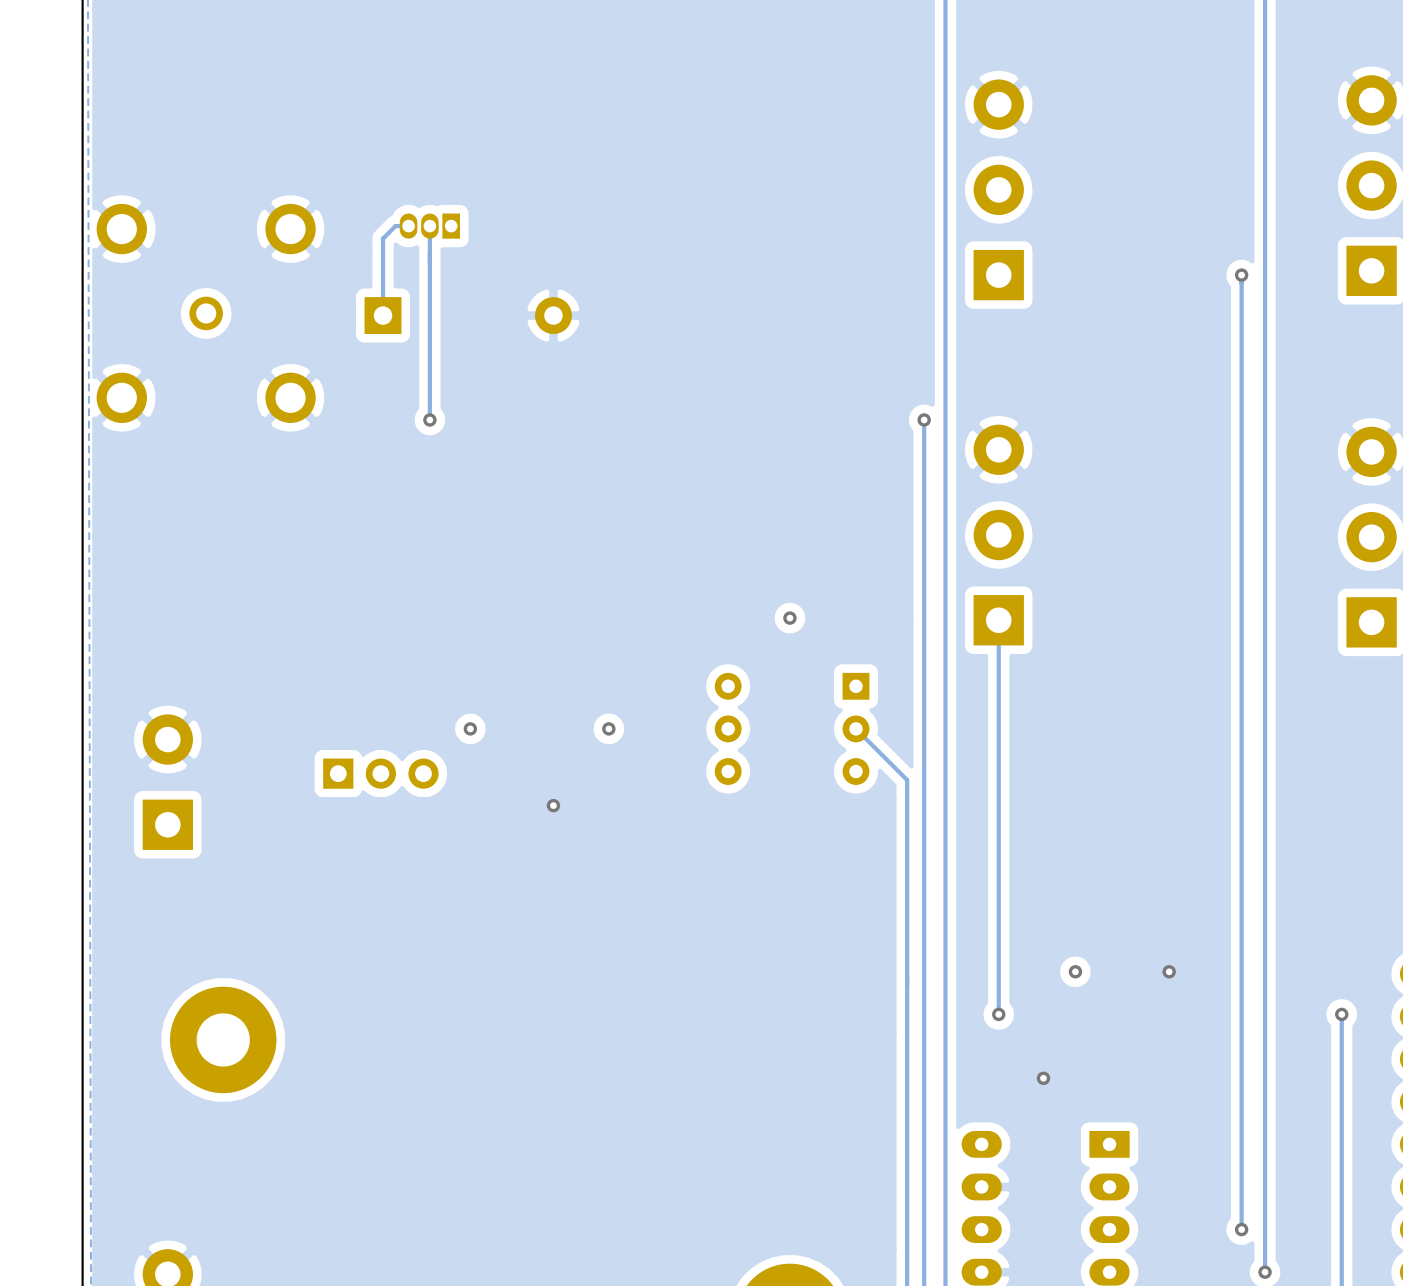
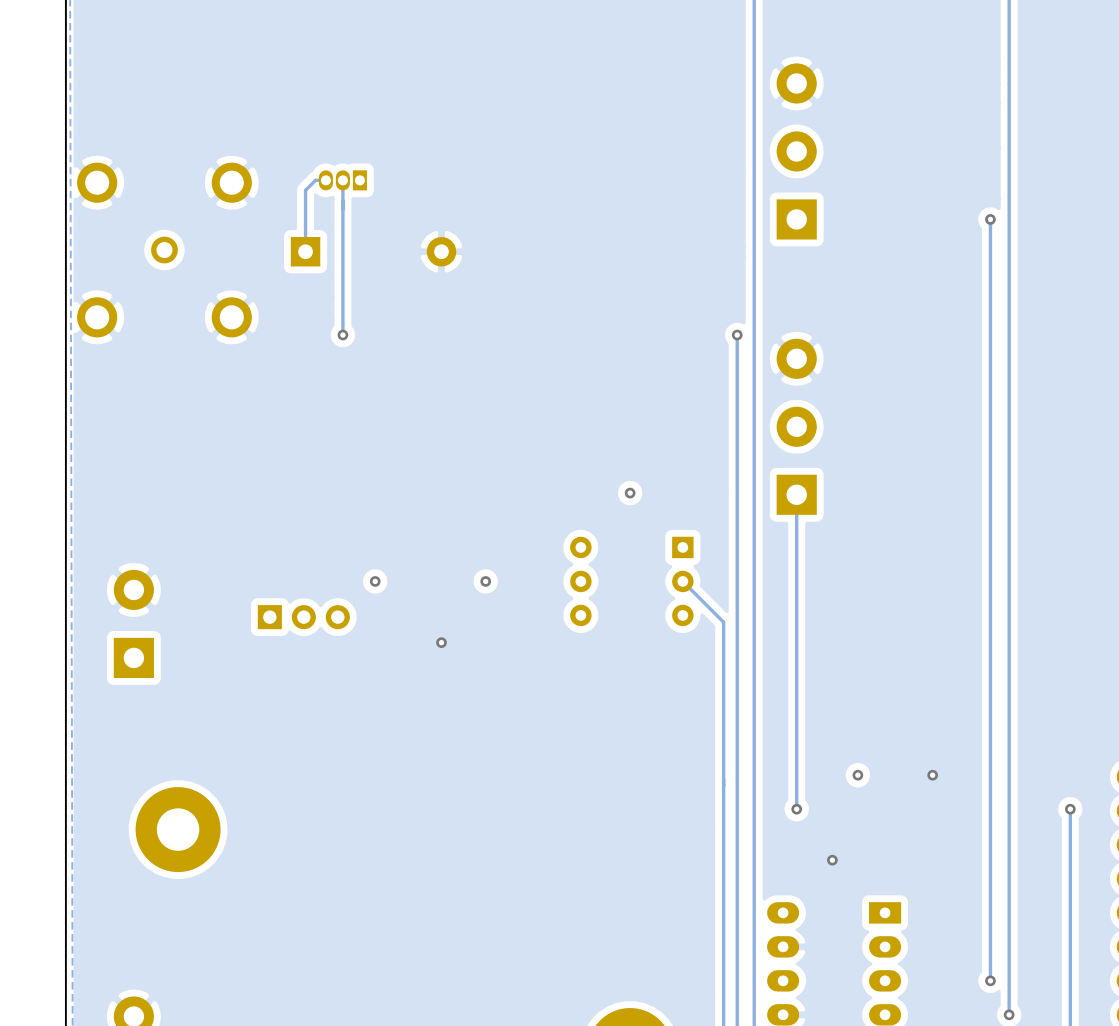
part: (1371, 185) -> none
part: (1371, 537) -> none

